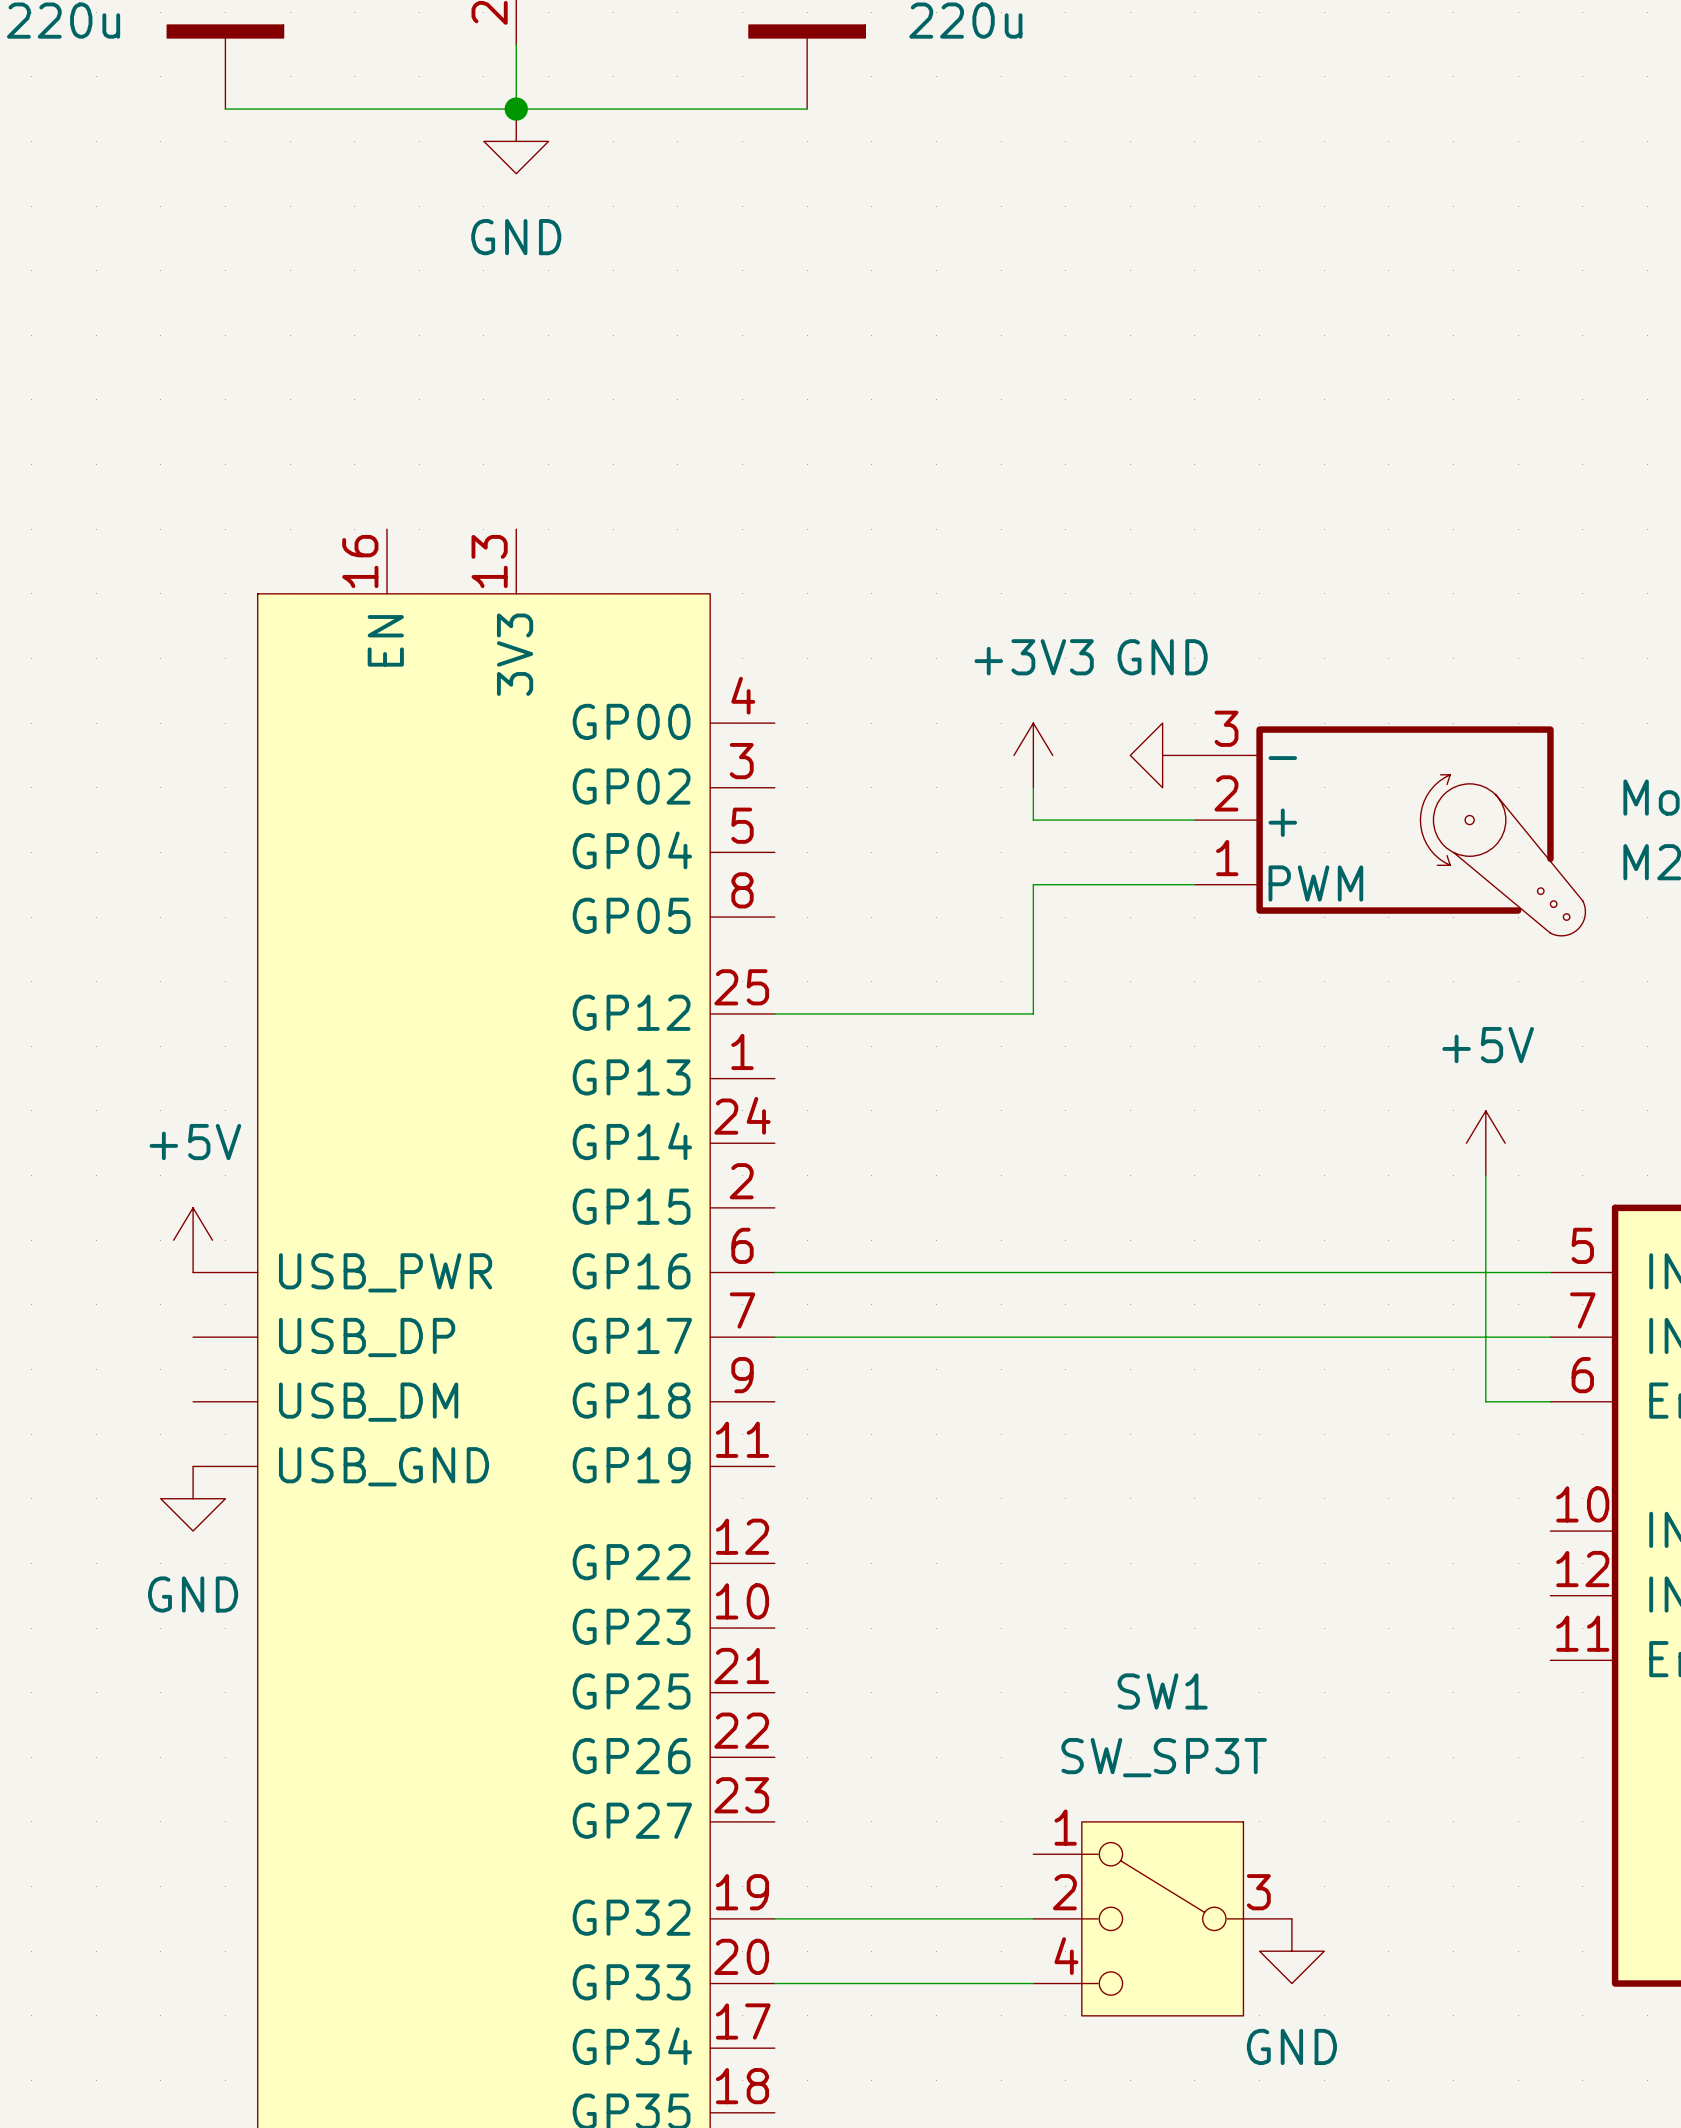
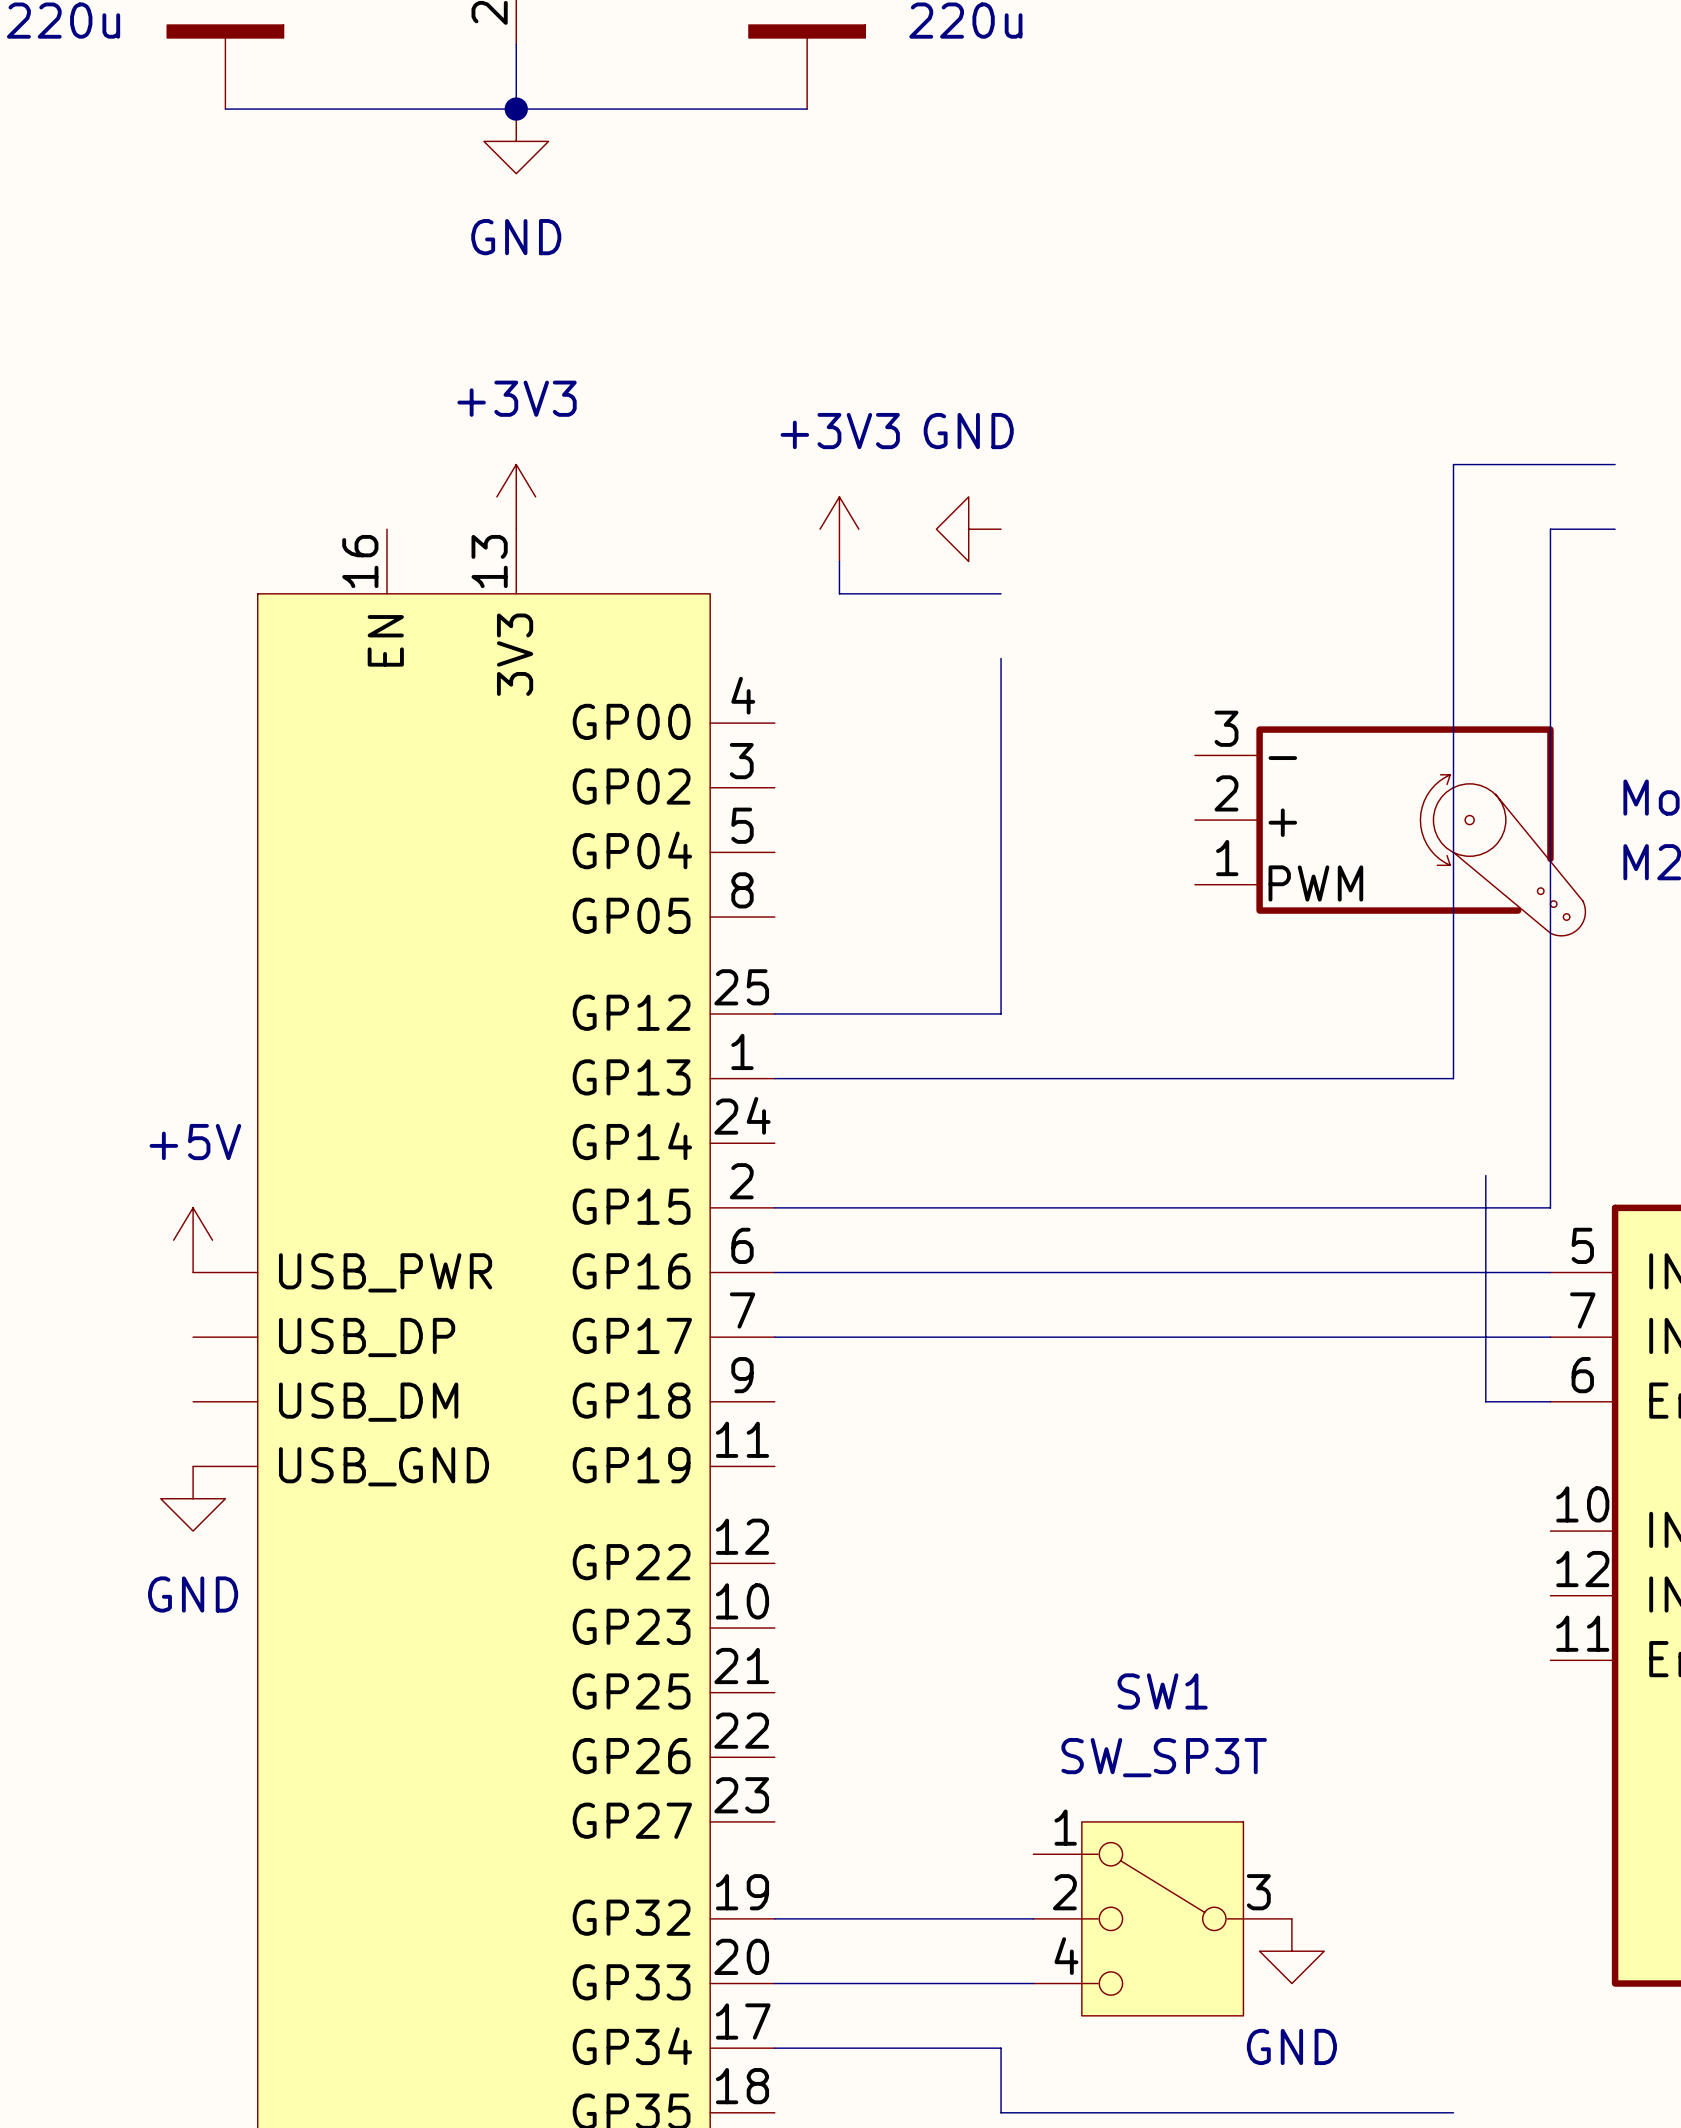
wire: none -> (1615, 464) (1453, 464) (1453, 1078) (774, 1078)
power symbol: none -> +3V3 (516, 496)
power symbol: none -> +3V3 (839, 529)
wire: none -> (1615, 529) (1550, 529) (1550, 1207) (774, 1207)
power symbol: +3V3 (1033, 755) -> none
power symbol position: GND (1162, 755) -> GND (968, 529)
wire: (1033, 787) (1033, 820) (1194, 820) -> (839, 561) (839, 593) (1001, 593)
wire: (1194, 884) (1033, 884) (1033, 1013) (1001, 1013) -> (1001, 658) (1001, 1013)
power symbol: +5V (1485, 1143) -> none
wire: none -> (774, 2048) (1001, 2048) (1001, 2112) (1453, 2112)

